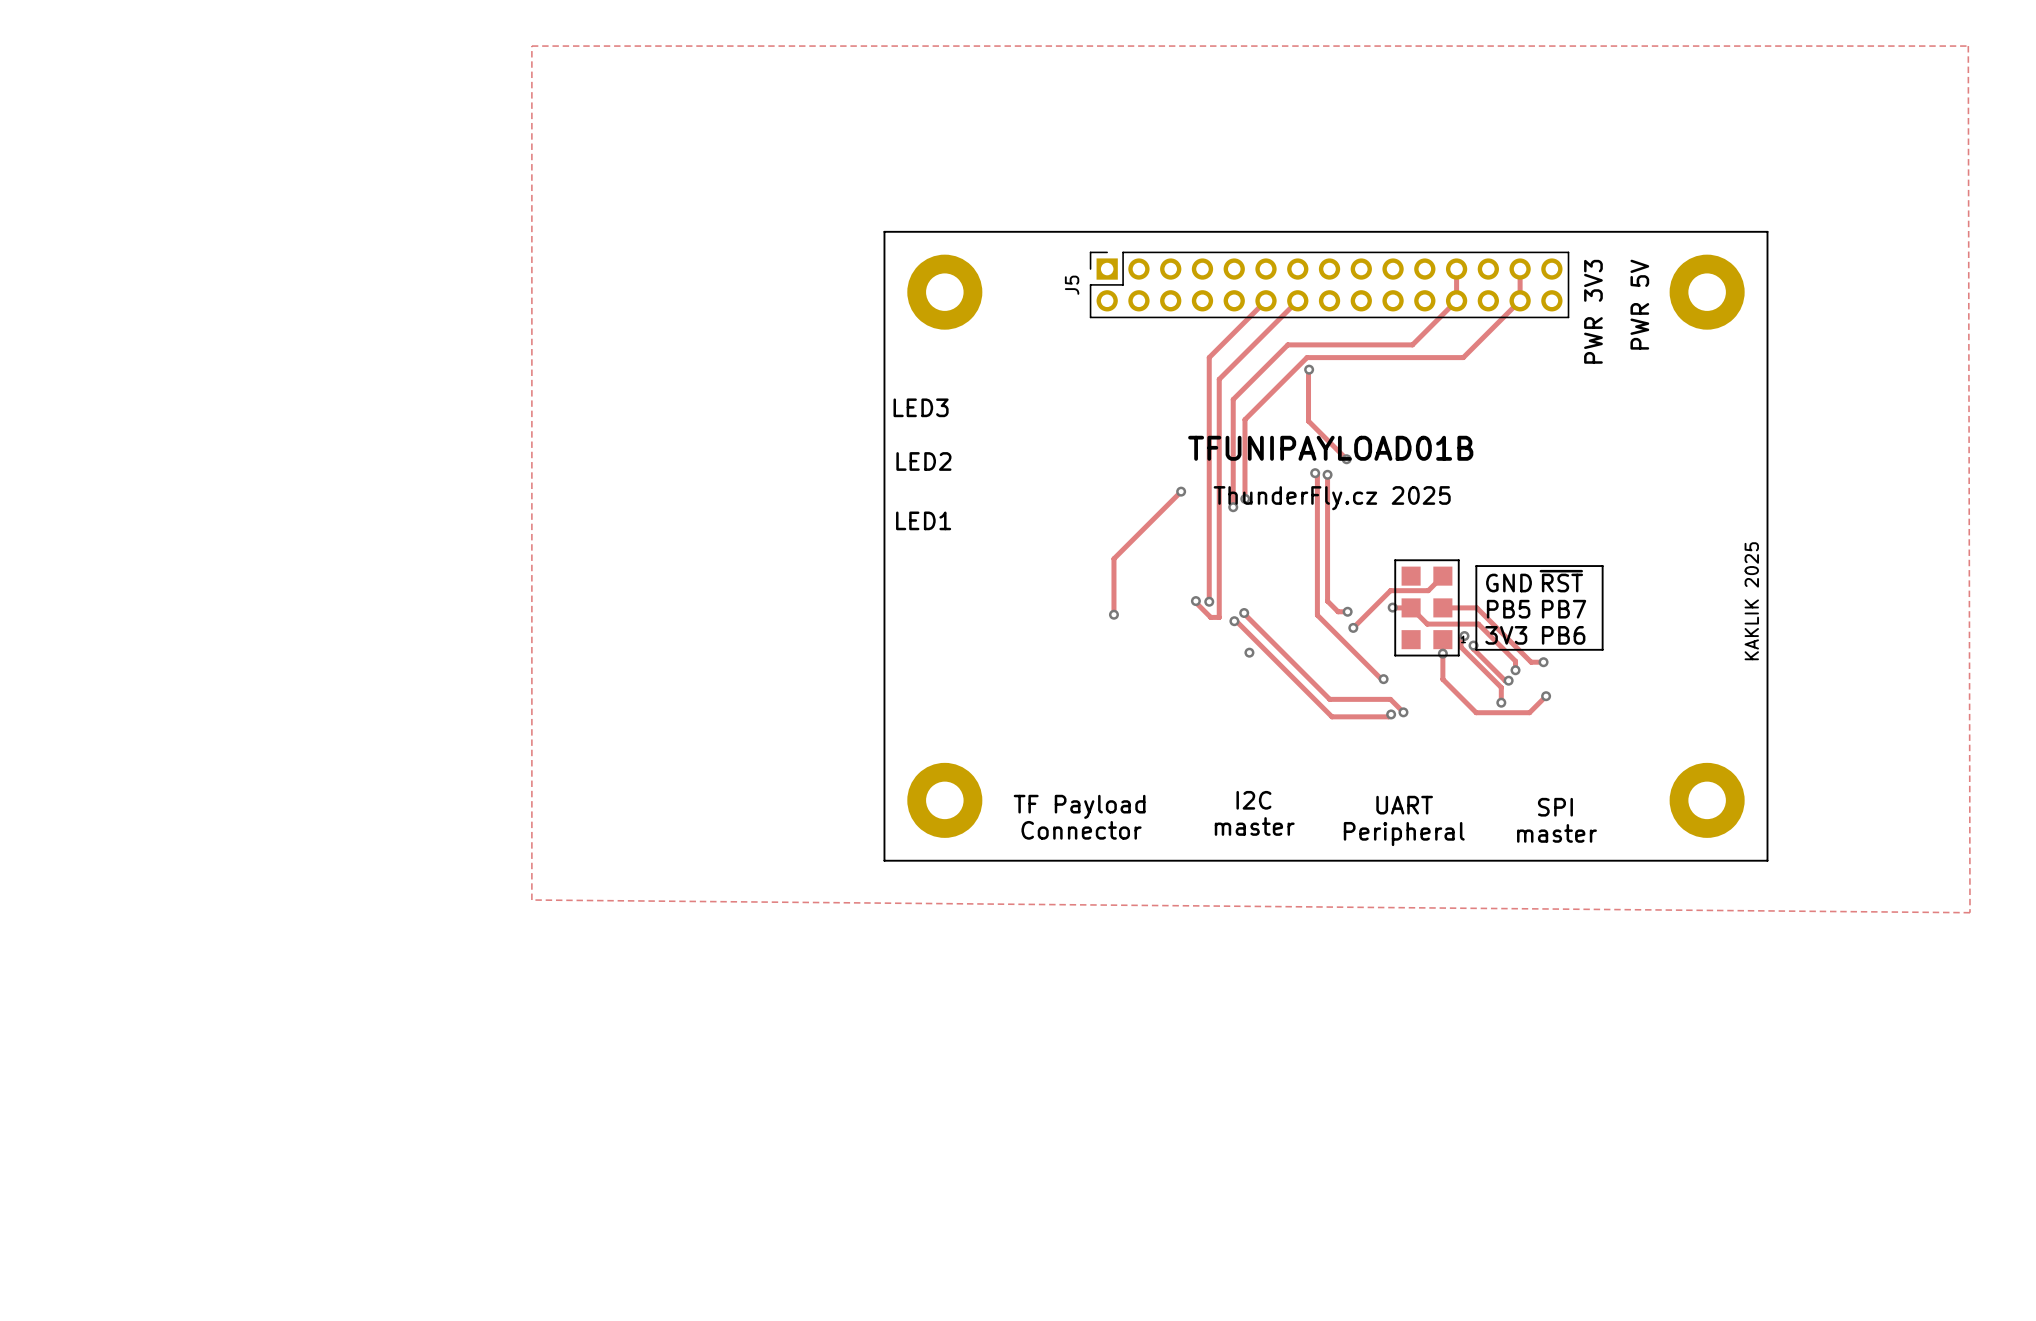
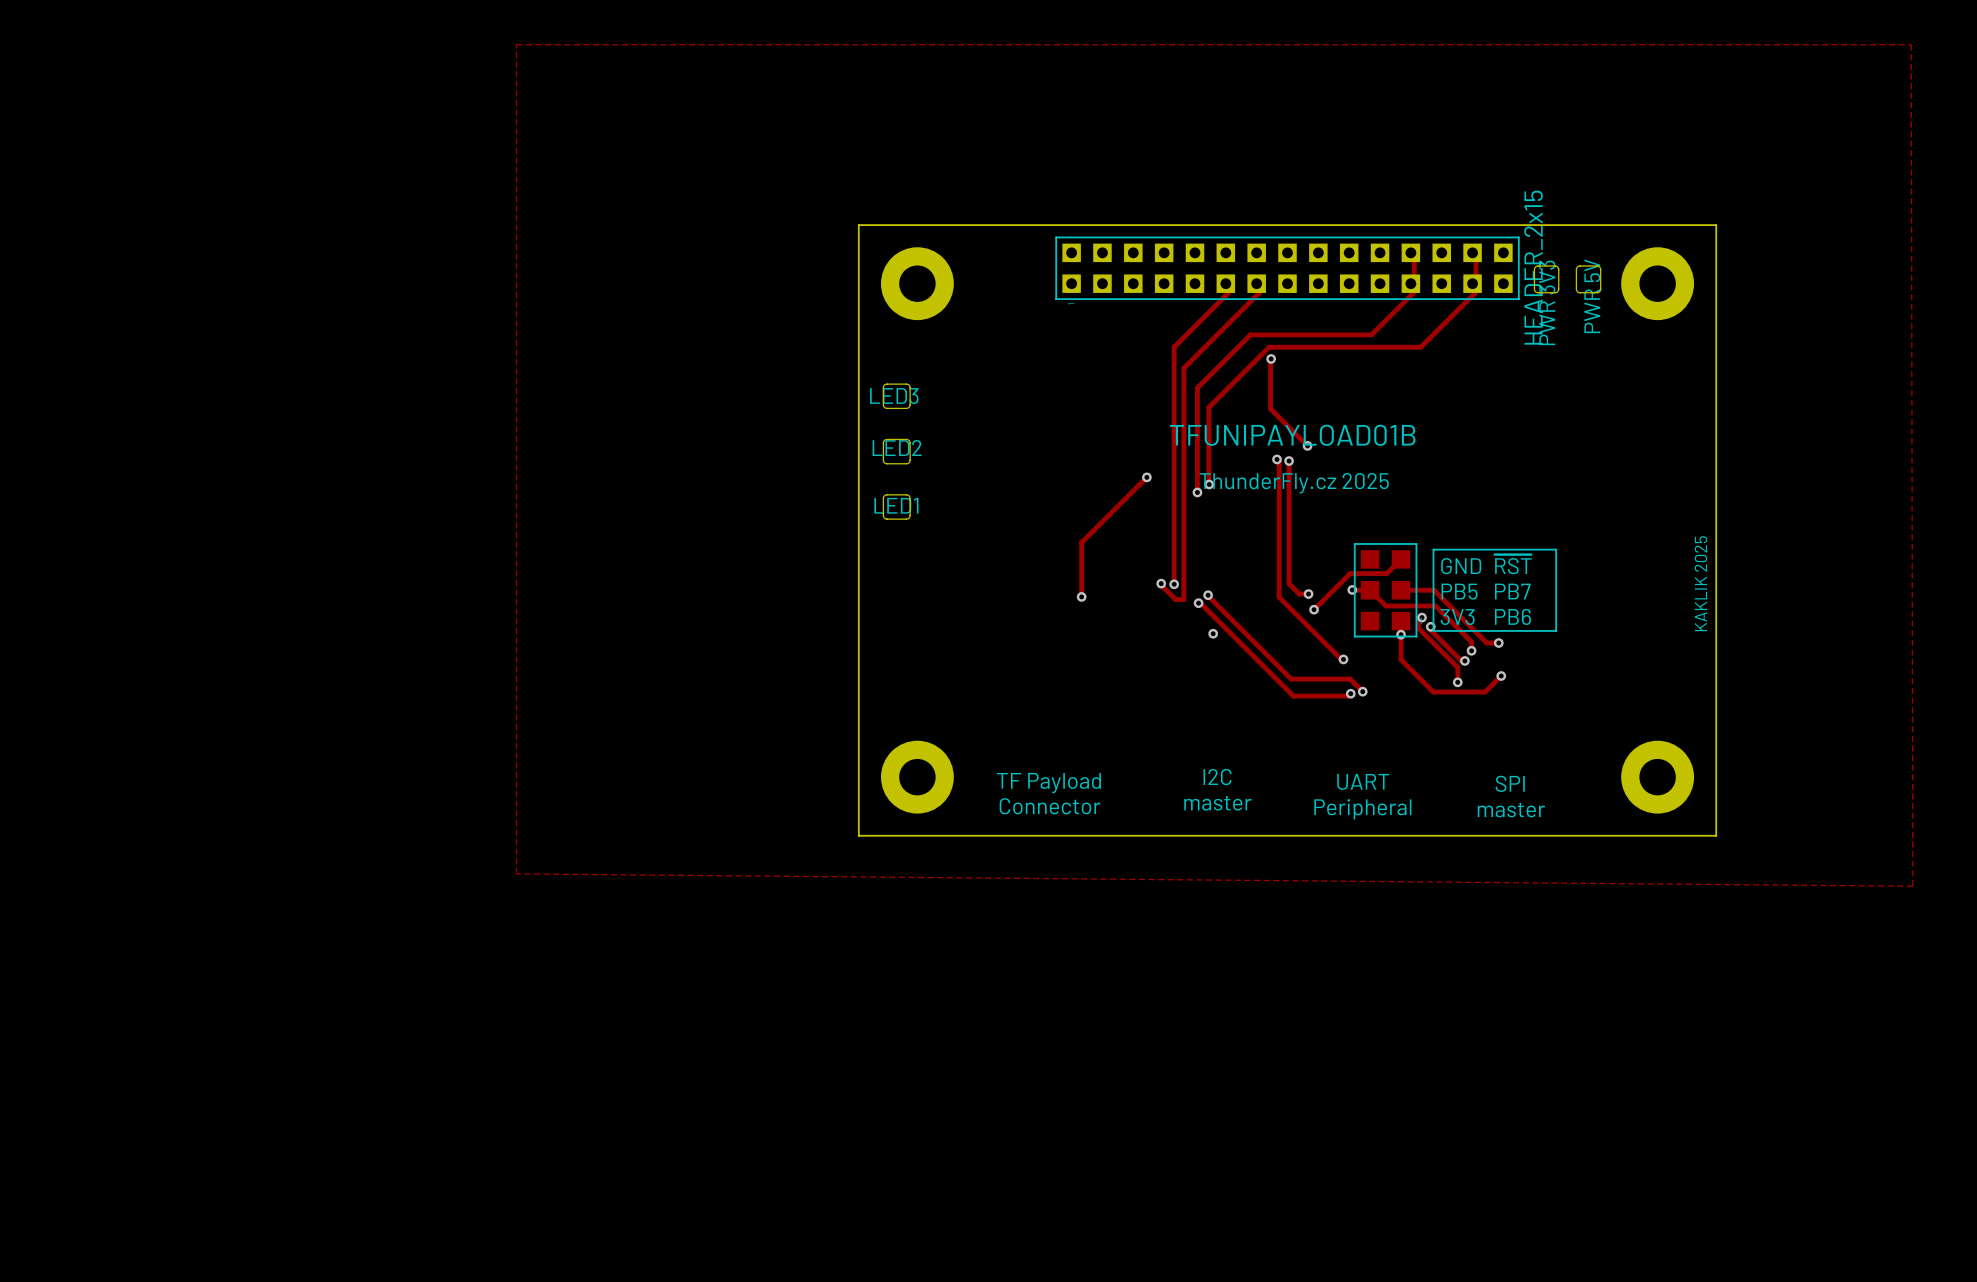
part: none -> HEADER_2x15 (1287, 268)
J5: (1329, 284) -> none
part: none -> (1546, 279)
part: none -> (1588, 279)
part: none -> (896, 396)
part: none -> (896, 451)
part: none -> (896, 506)

